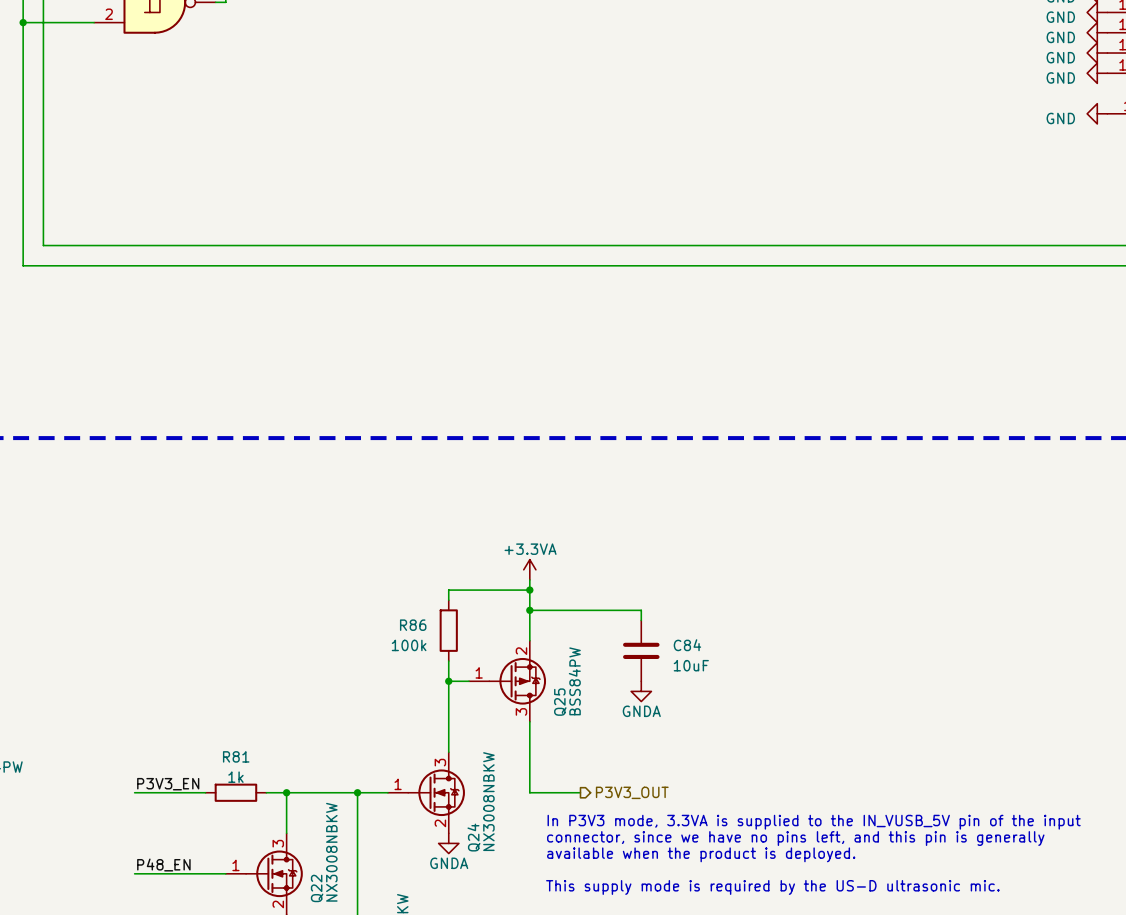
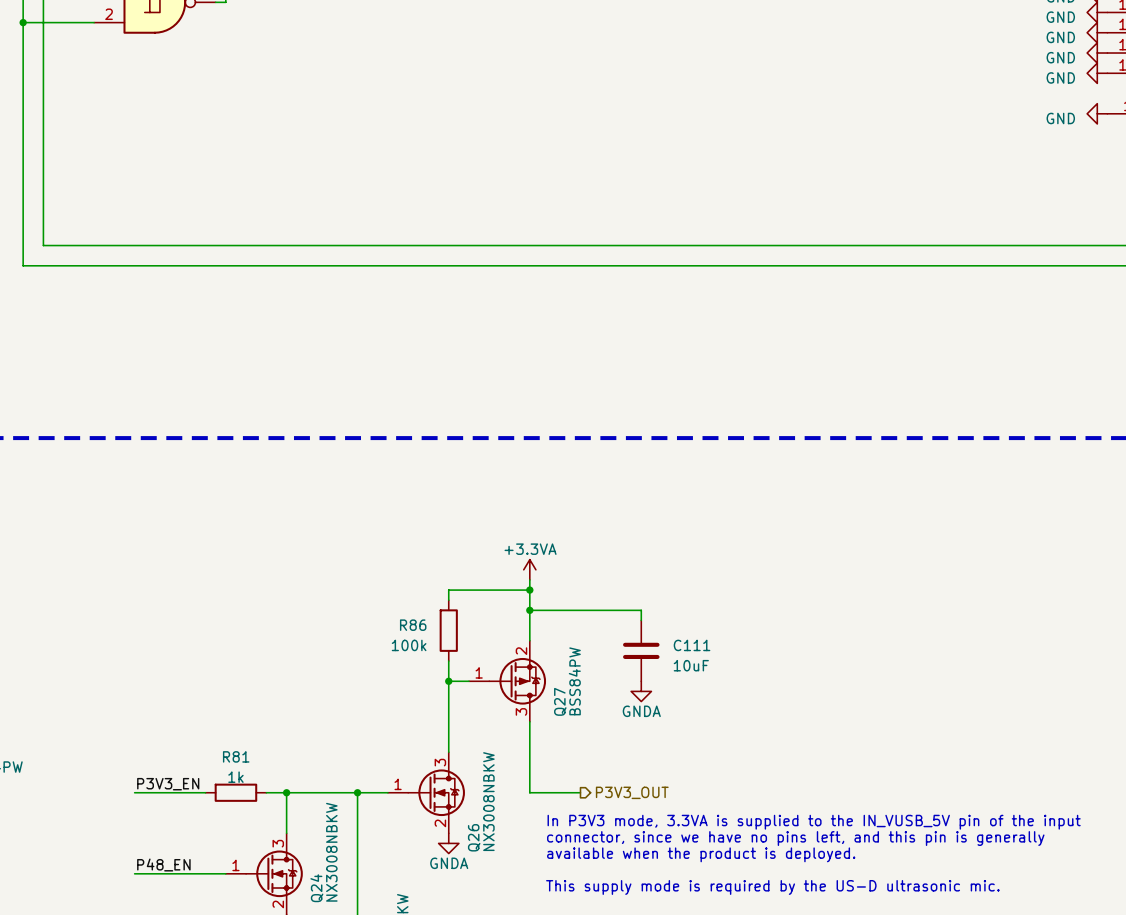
C84 name: C84 (687, 645) -> C111 (692, 645)
Q25 name: Q25 (560, 702) -> Q27 (560, 701)
Q24 name: Q24 (473, 837) -> Q26 (474, 837)
Q22 name: Q22 (317, 888) -> Q24 (316, 888)

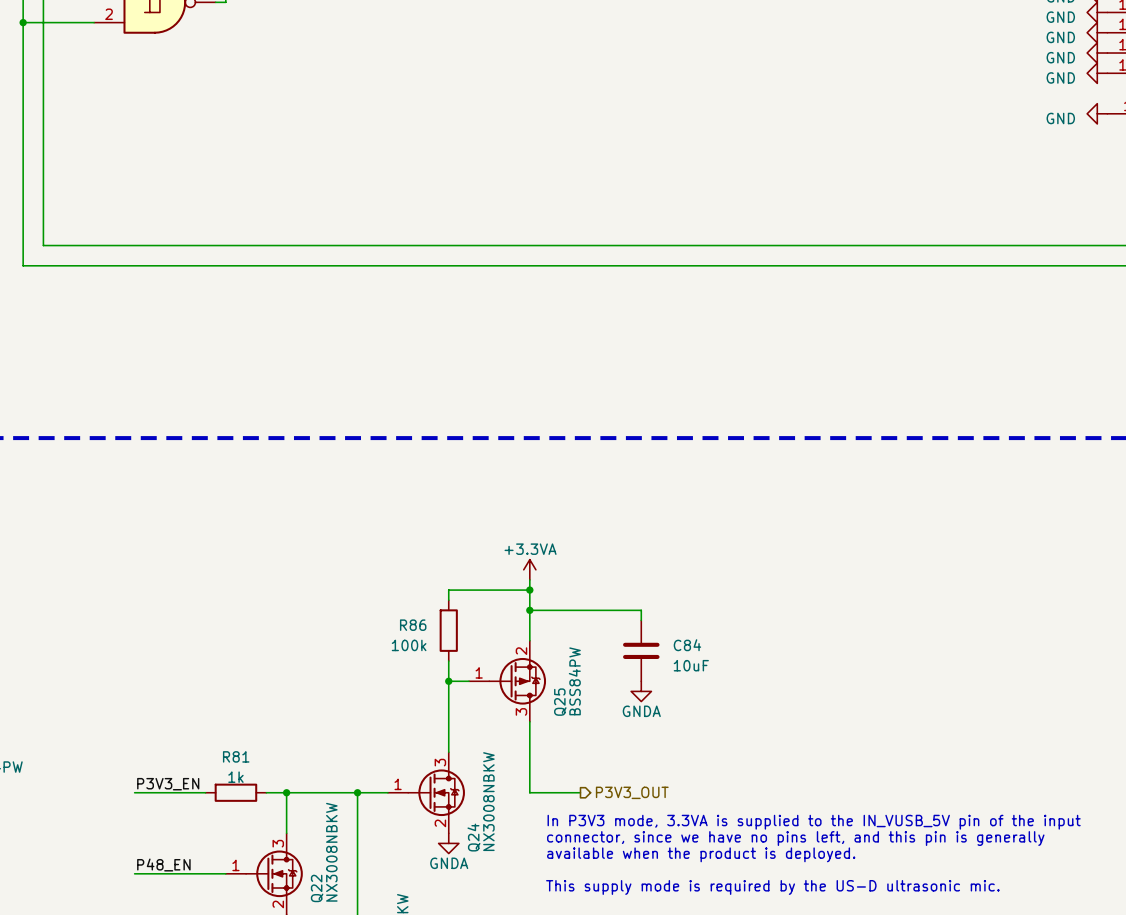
C111 name: C111 (692, 645) -> C84 (687, 645)
Q27 name: Q27 (560, 701) -> Q25 (560, 702)
Q26 name: Q26 (474, 837) -> Q24 (473, 837)
Q24 name: Q24 (316, 888) -> Q22 (317, 888)

